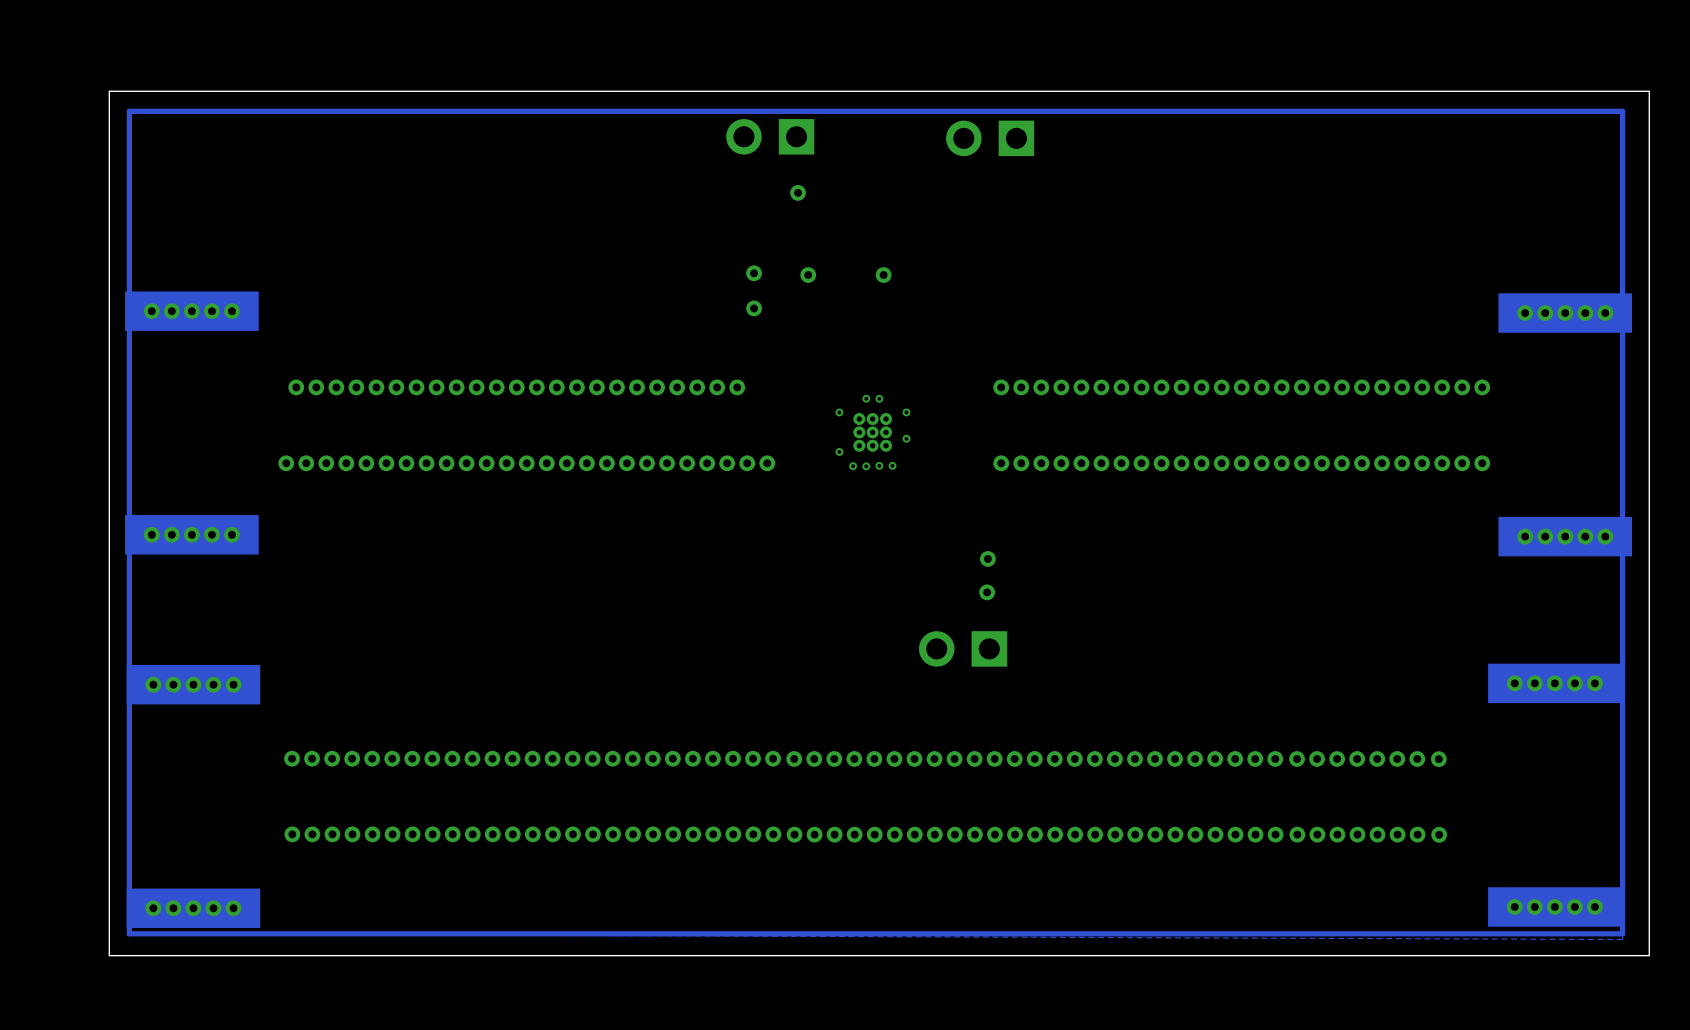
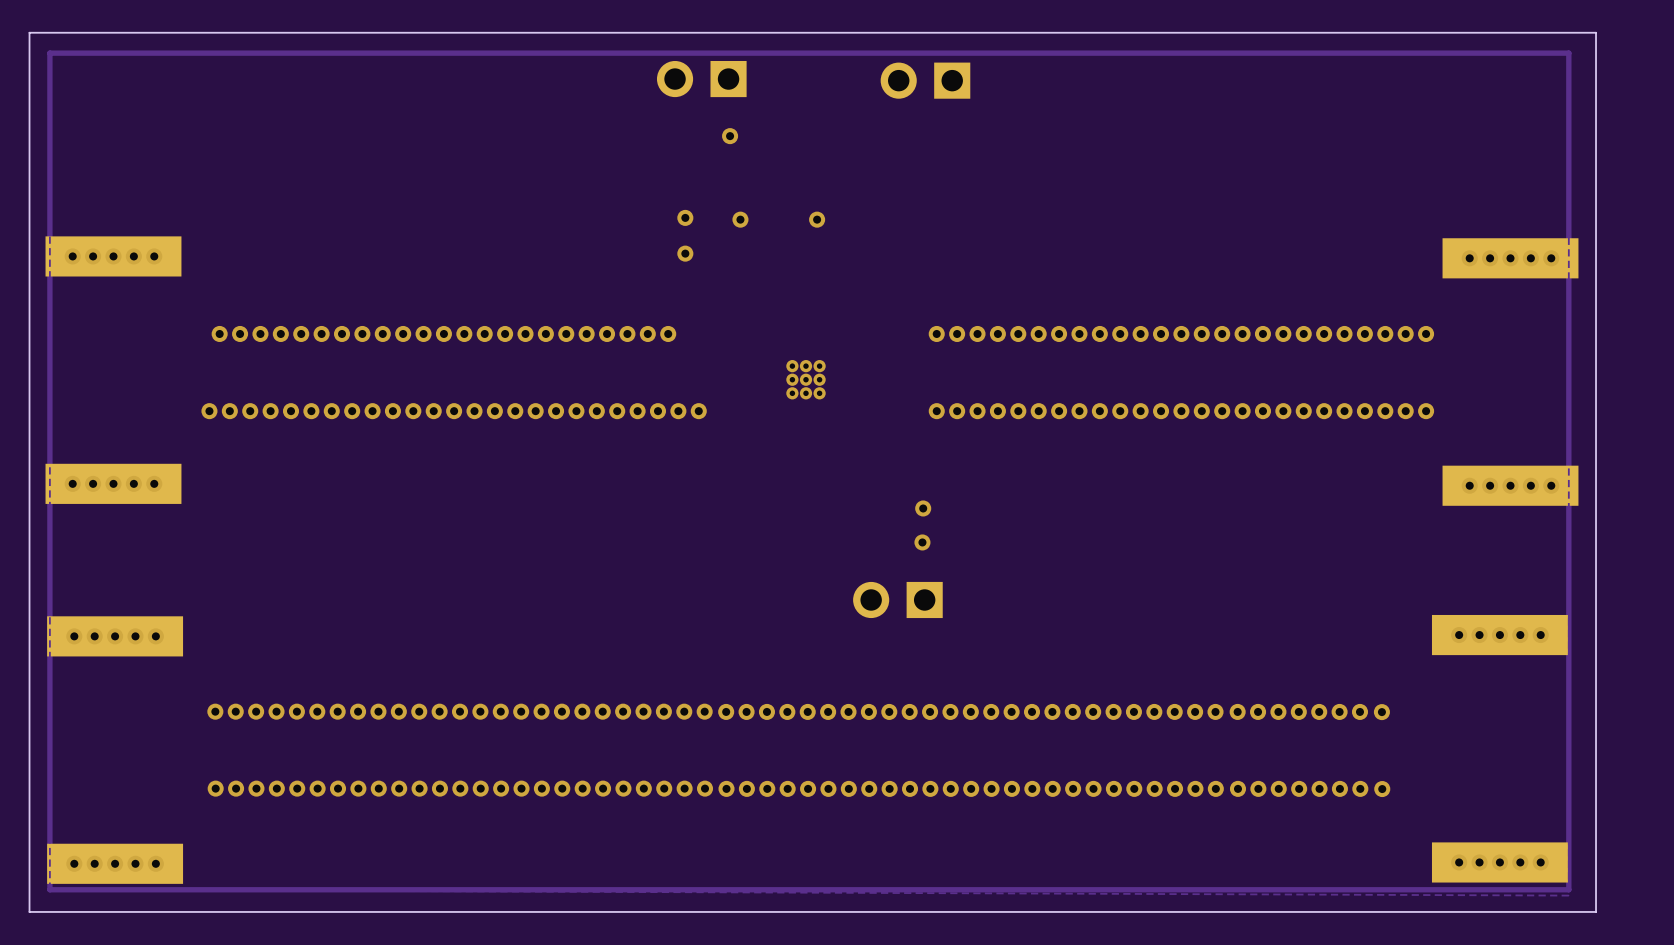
via: (866, 398) -> none
via: (879, 398) -> none
via: (839, 412) -> none
via: (906, 412) -> none
via: (906, 438) -> none
via: (839, 451) -> none
via: (879, 465) -> none
via: (892, 465) -> none
via: (853, 466) -> none
via: (866, 466) -> none

